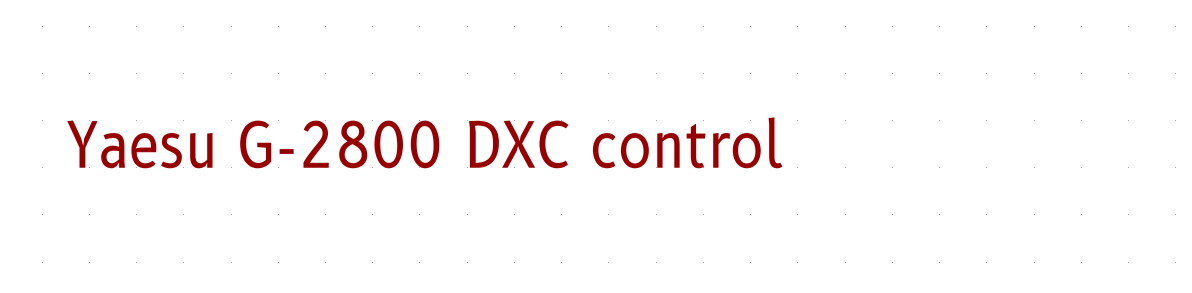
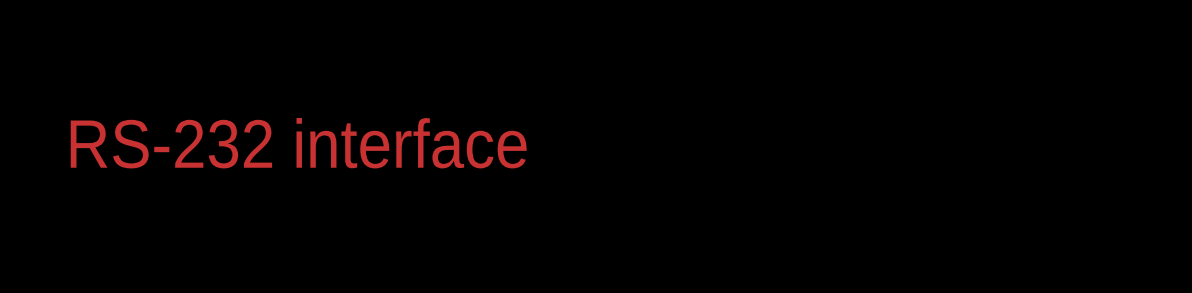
text: Yaesu G-2800 DXC control (424, 142) -> RS-232 interface (298, 143)

